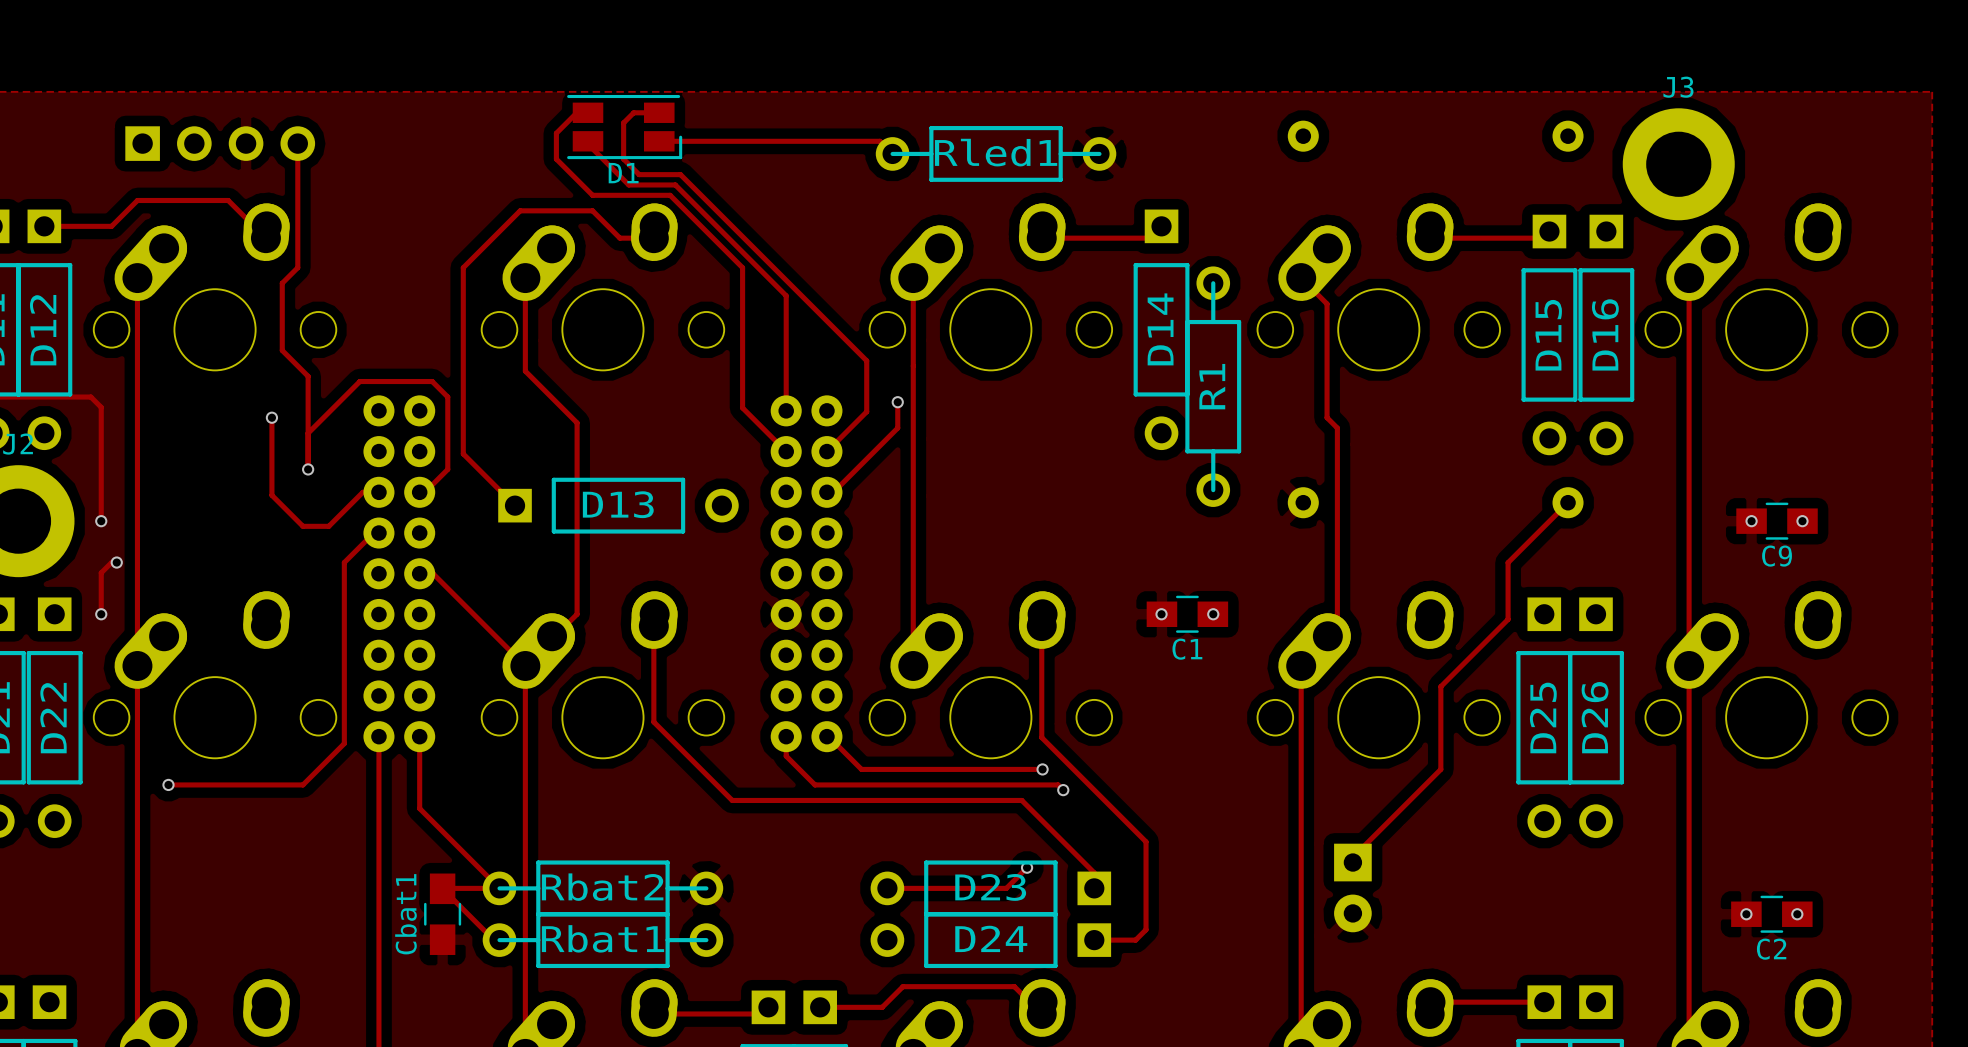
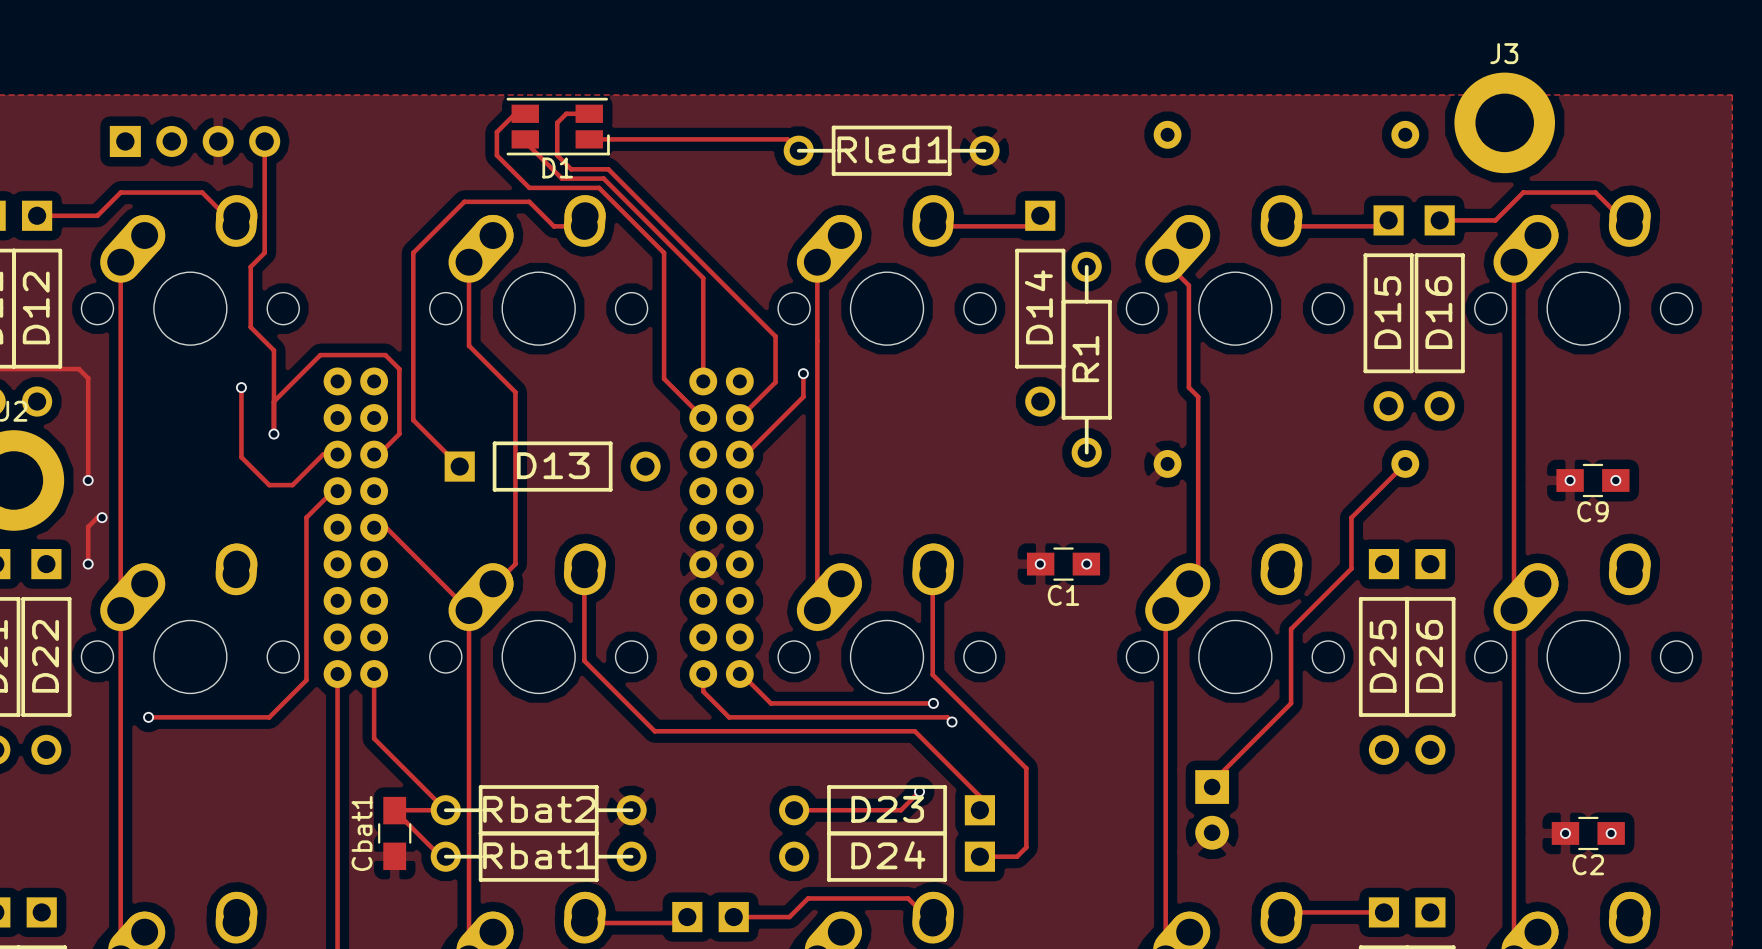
J3 position: (1678, 164) -> (1504, 122)
track: none -> (1439, 220) (1495, 220) (1523, 192) (1595, 192) (1629, 226)

